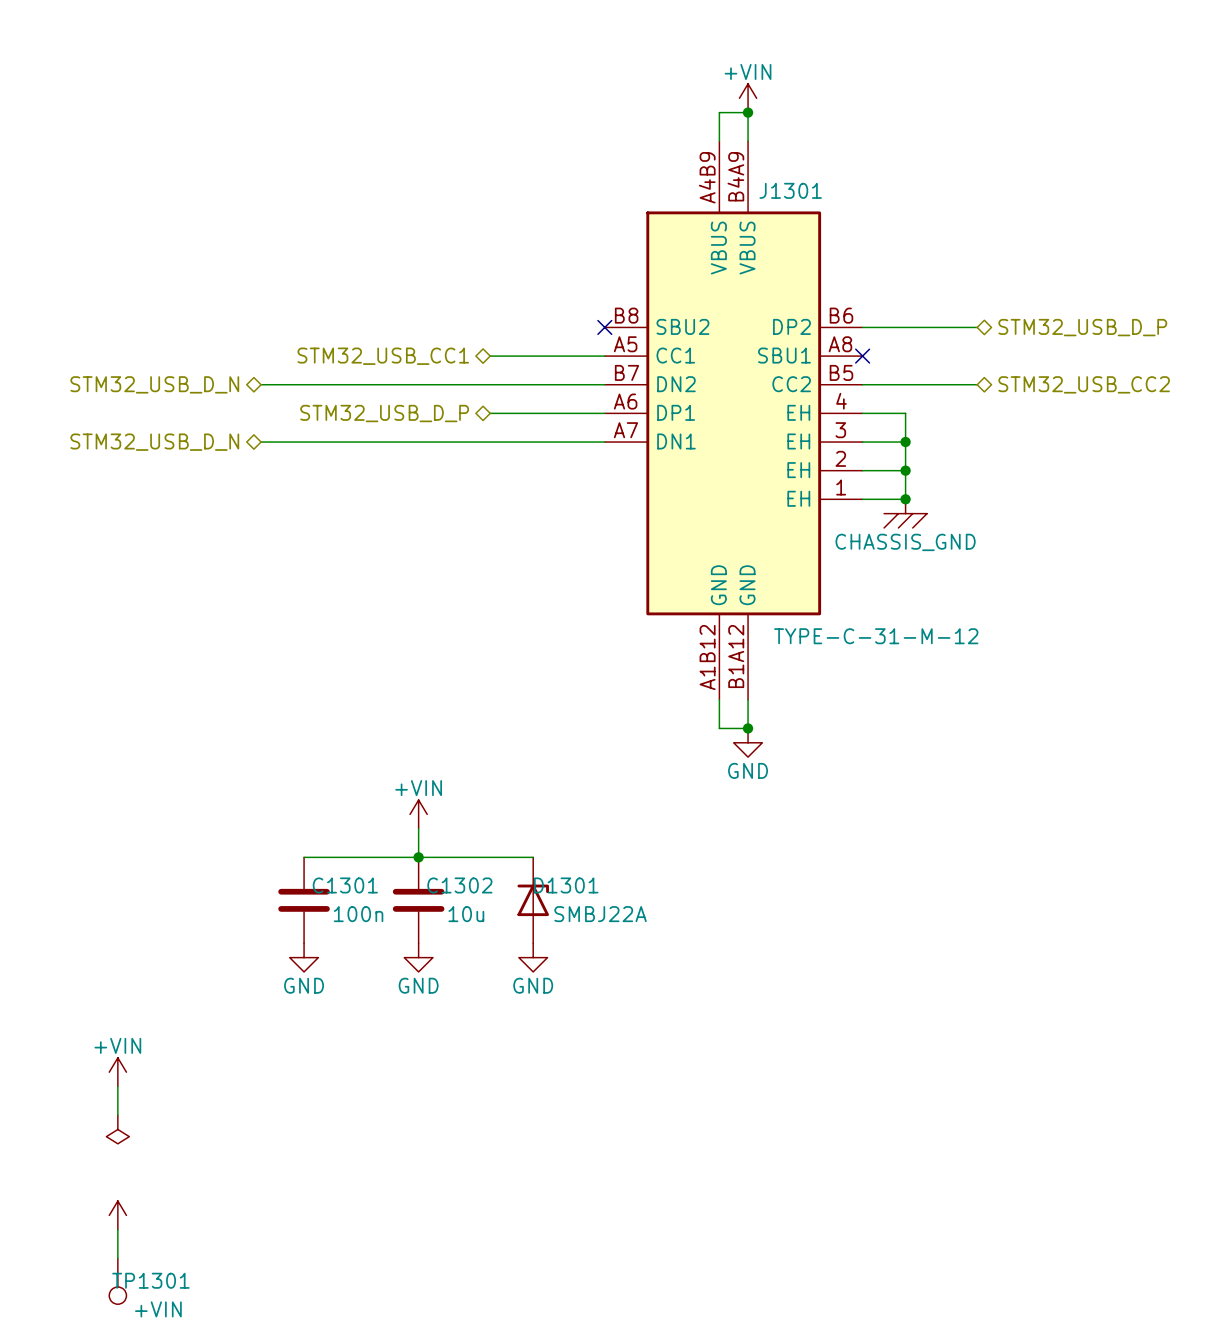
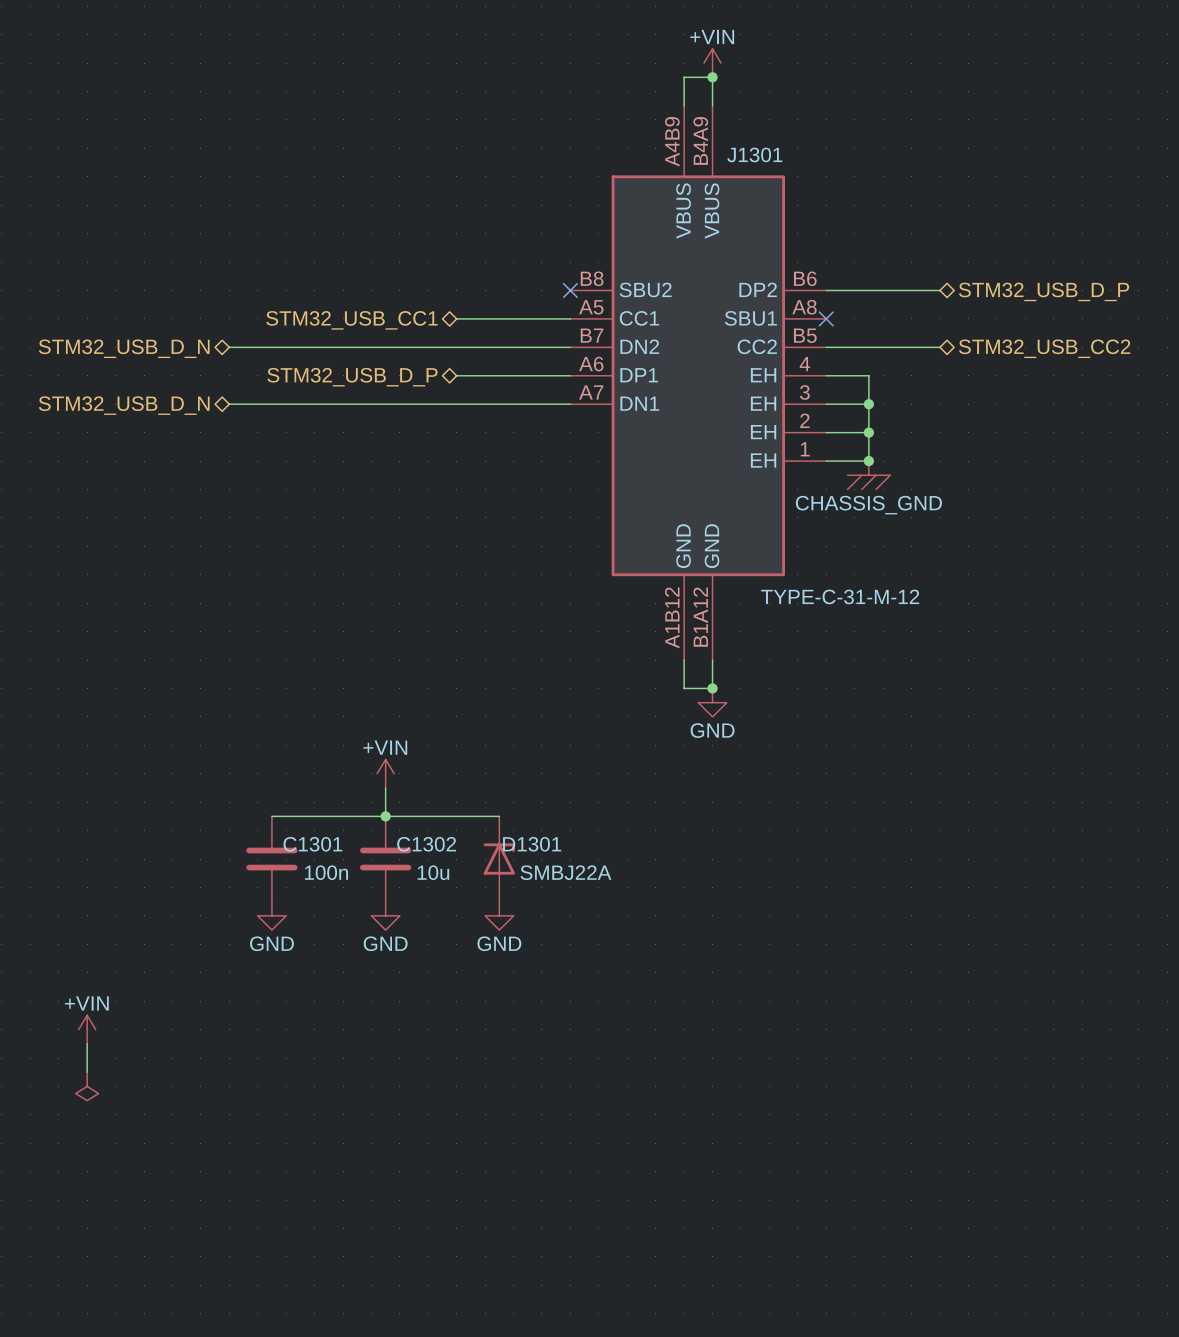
power symbol: (117, 1215) -> none
wire: (117, 1229) (117, 1258) -> none
TP1301: +VIN (117, 1281) -> none

